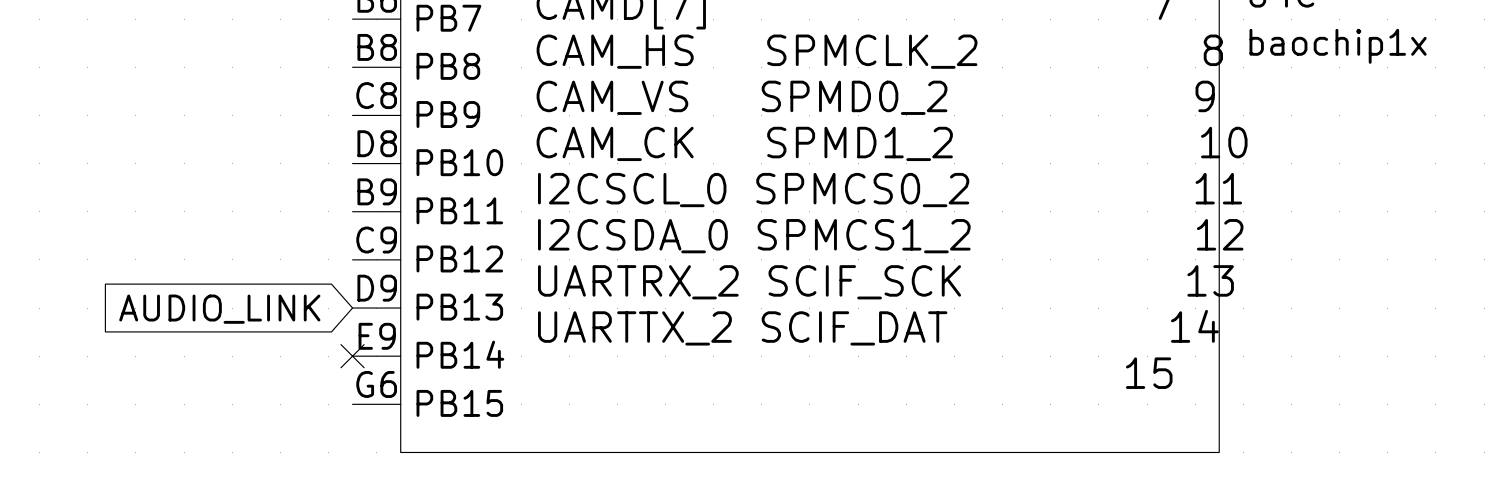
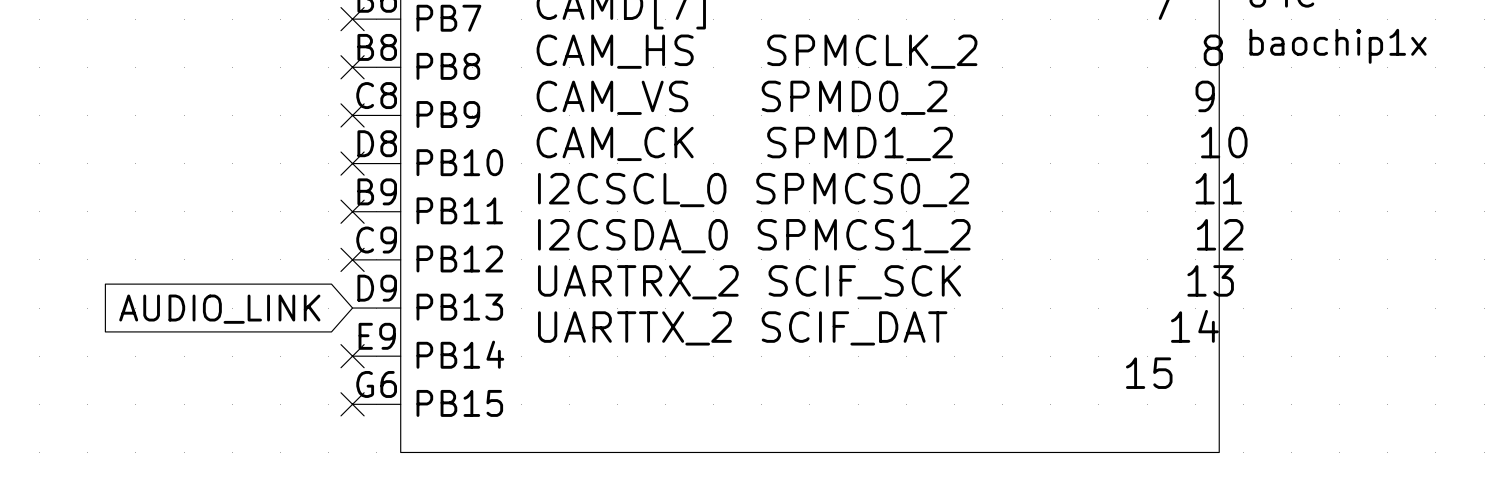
no-connect mark: none -> (352, 19)
no-connect mark: none -> (352, 67)
no-connect mark: none -> (352, 115)
no-connect mark: none -> (352, 163)
no-connect mark: none -> (352, 211)
no-connect mark: none -> (352, 259)
no-connect mark: none -> (352, 404)

